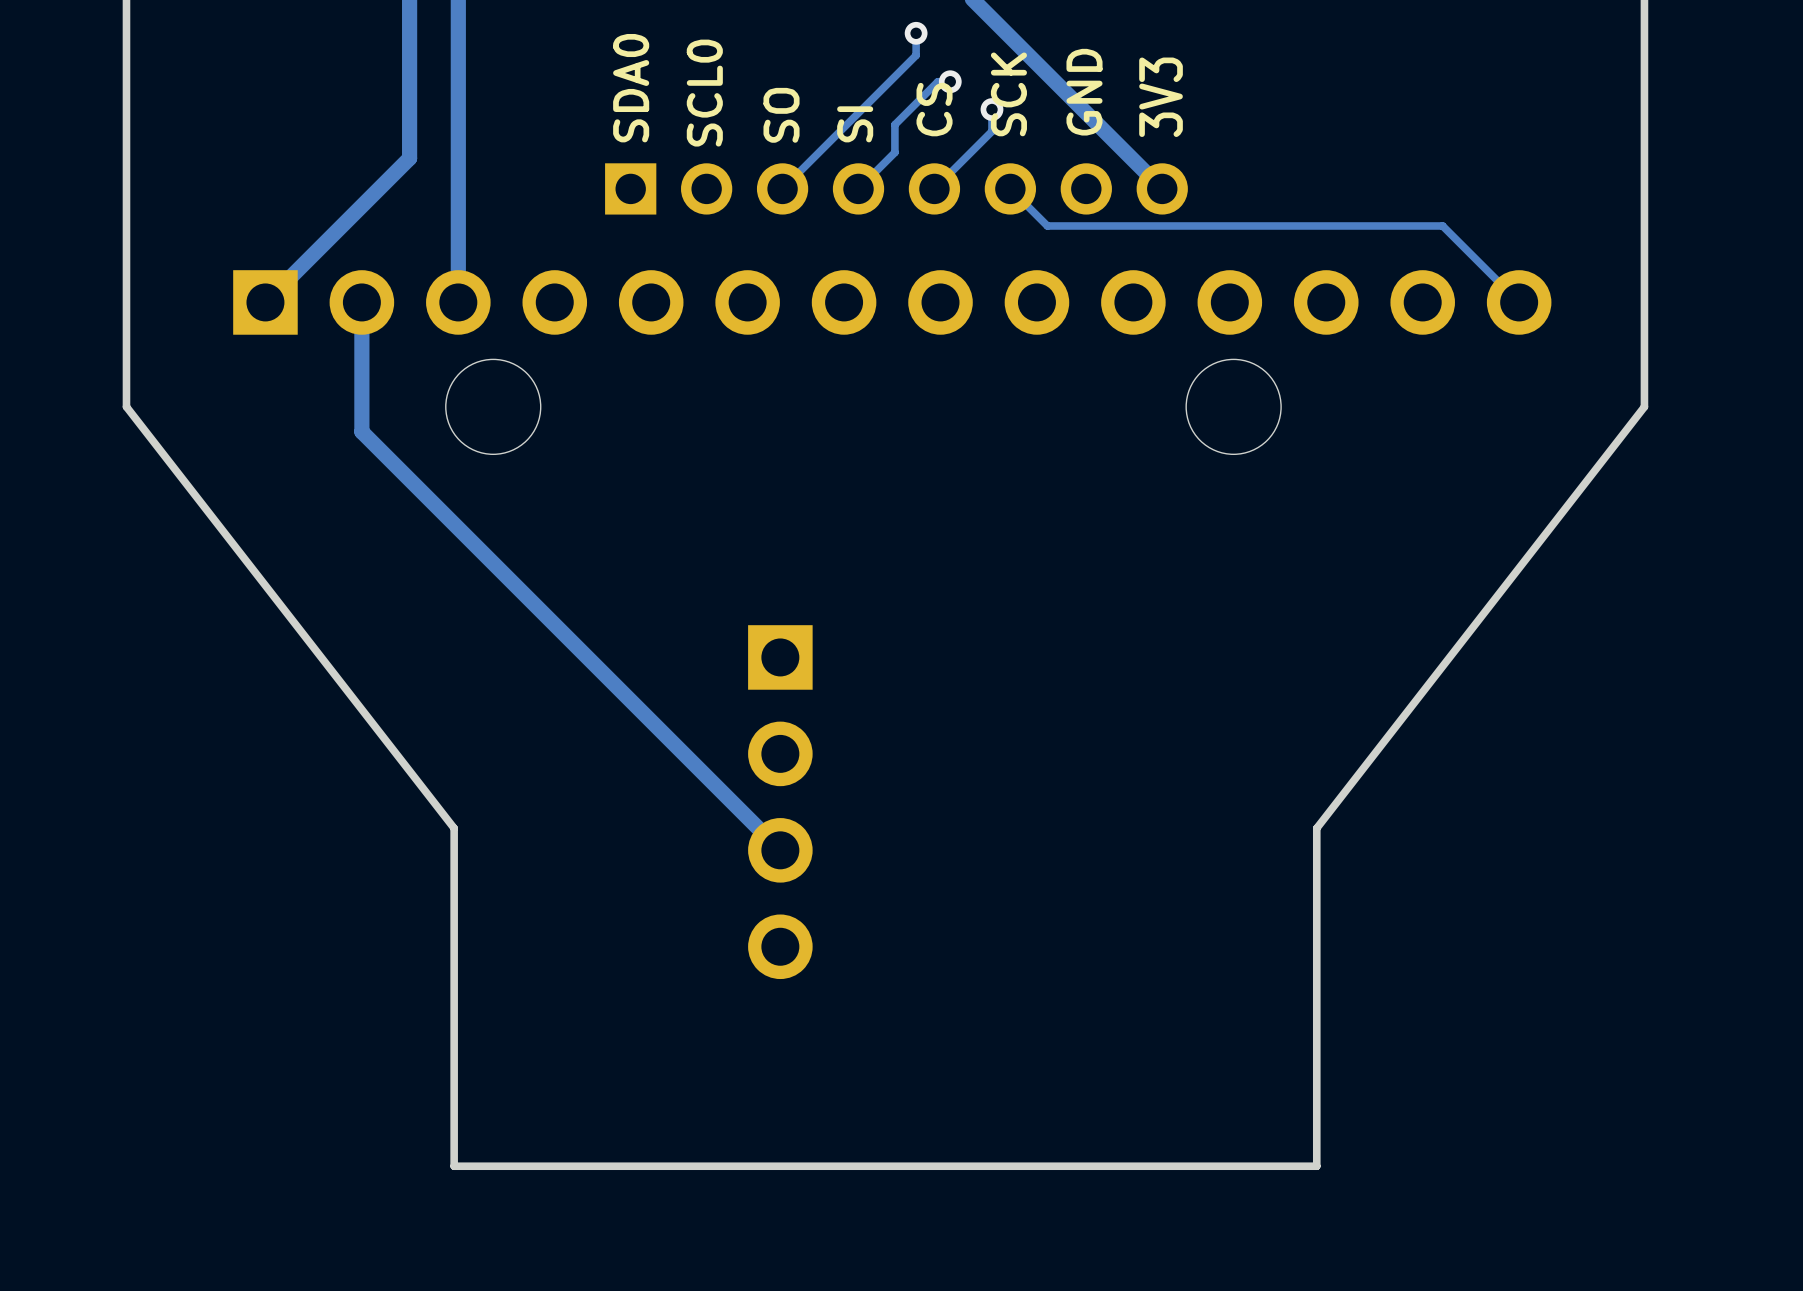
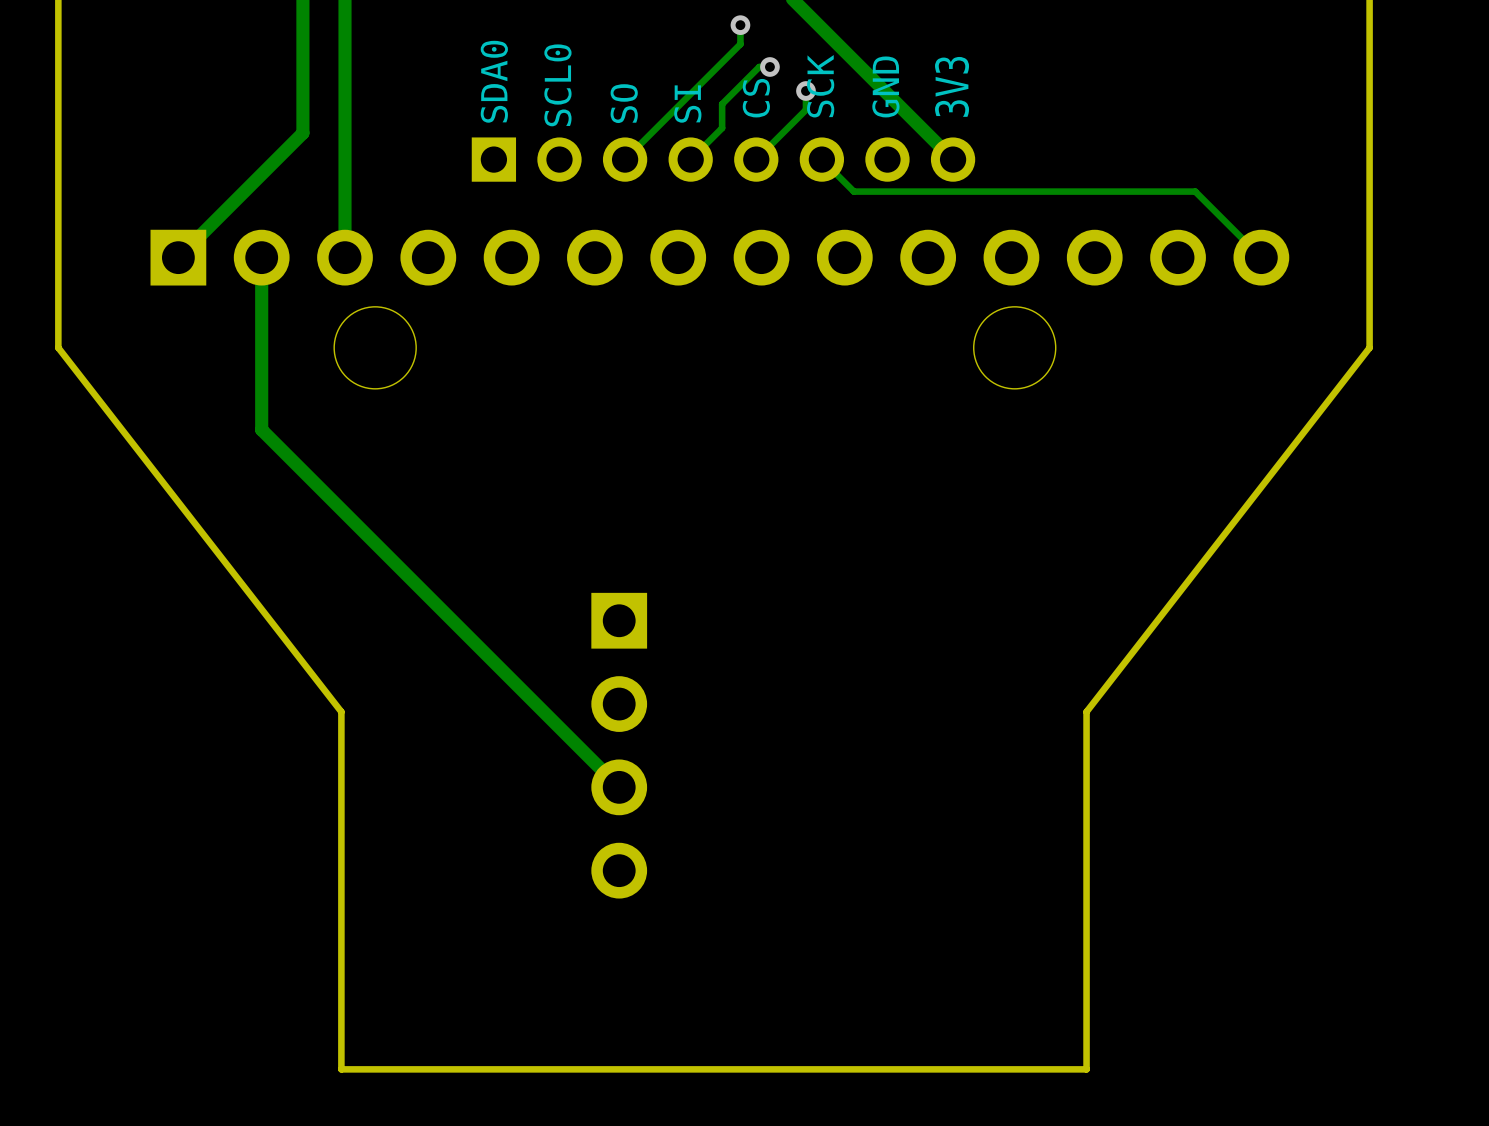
track: (361, 431) (780, 850) -> (261, 369) (261, 429) (619, 787)
part position: (780, 802) -> (619, 745)
board edge: (1316, 1166) (454, 1166) -> (1086, 1003) (1086, 1069) (341, 1069) (341, 1003)

